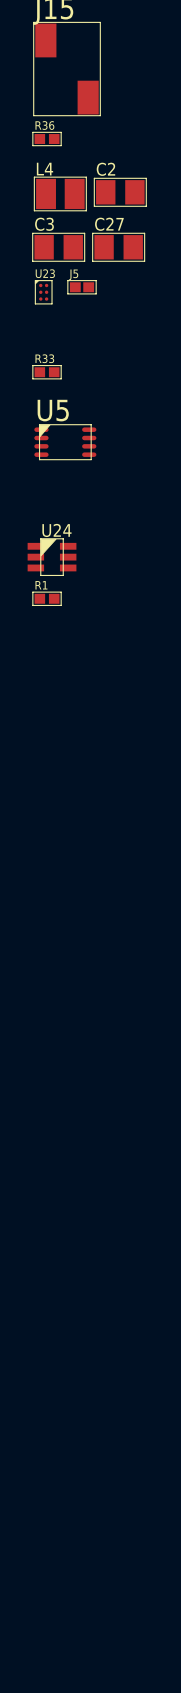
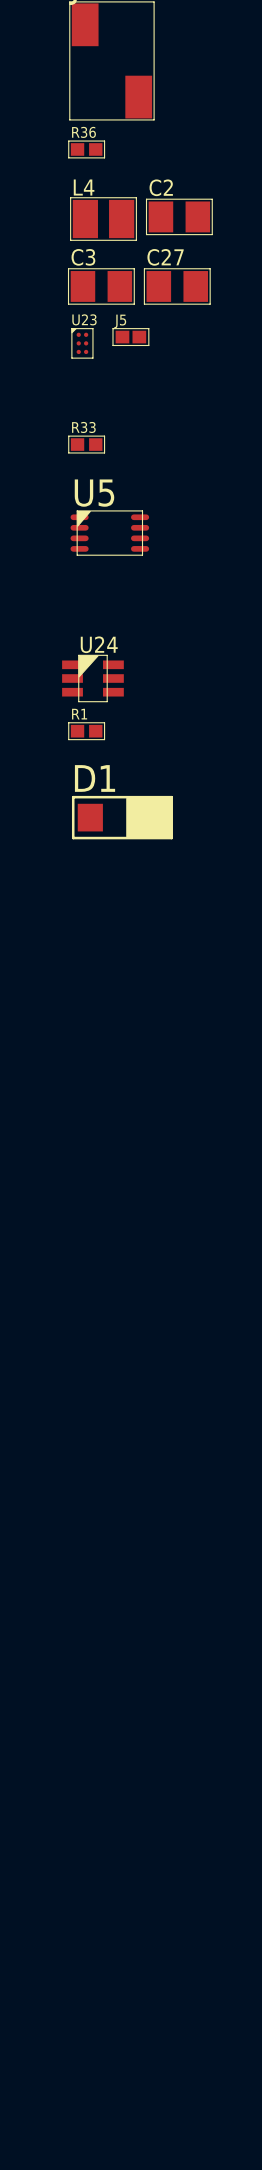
D1: none -> (122, 817)

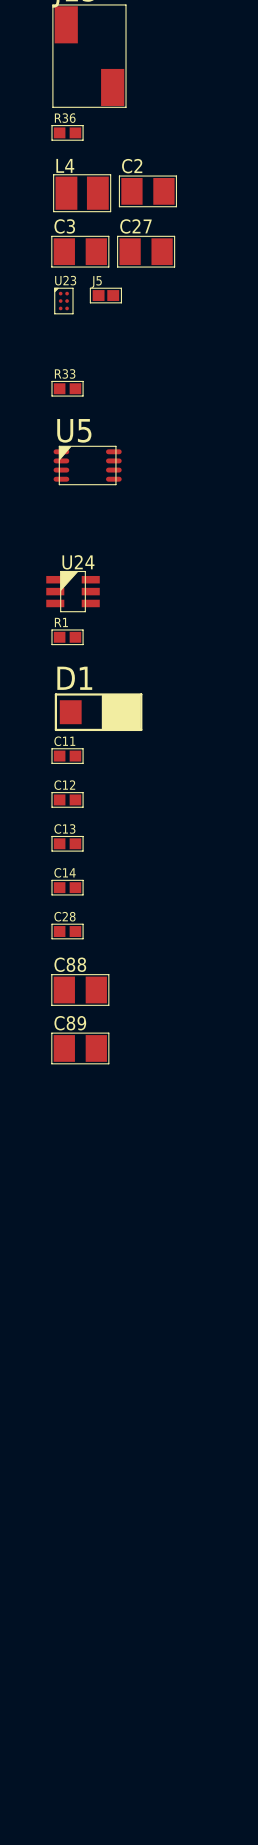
C11: none -> (67, 756)
C12: none -> (67, 799)
C13: none -> (67, 843)
C14: none -> (67, 887)
C28: none -> (67, 931)
C88: none -> (80, 989)
C89: none -> (80, 1048)

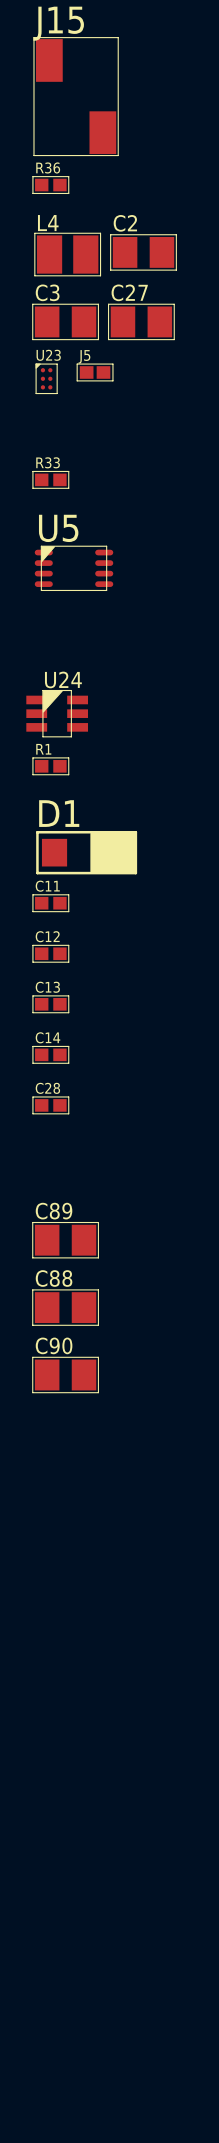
C88 position: (80, 989) -> (65, 1307)
C90: none -> (65, 1374)

